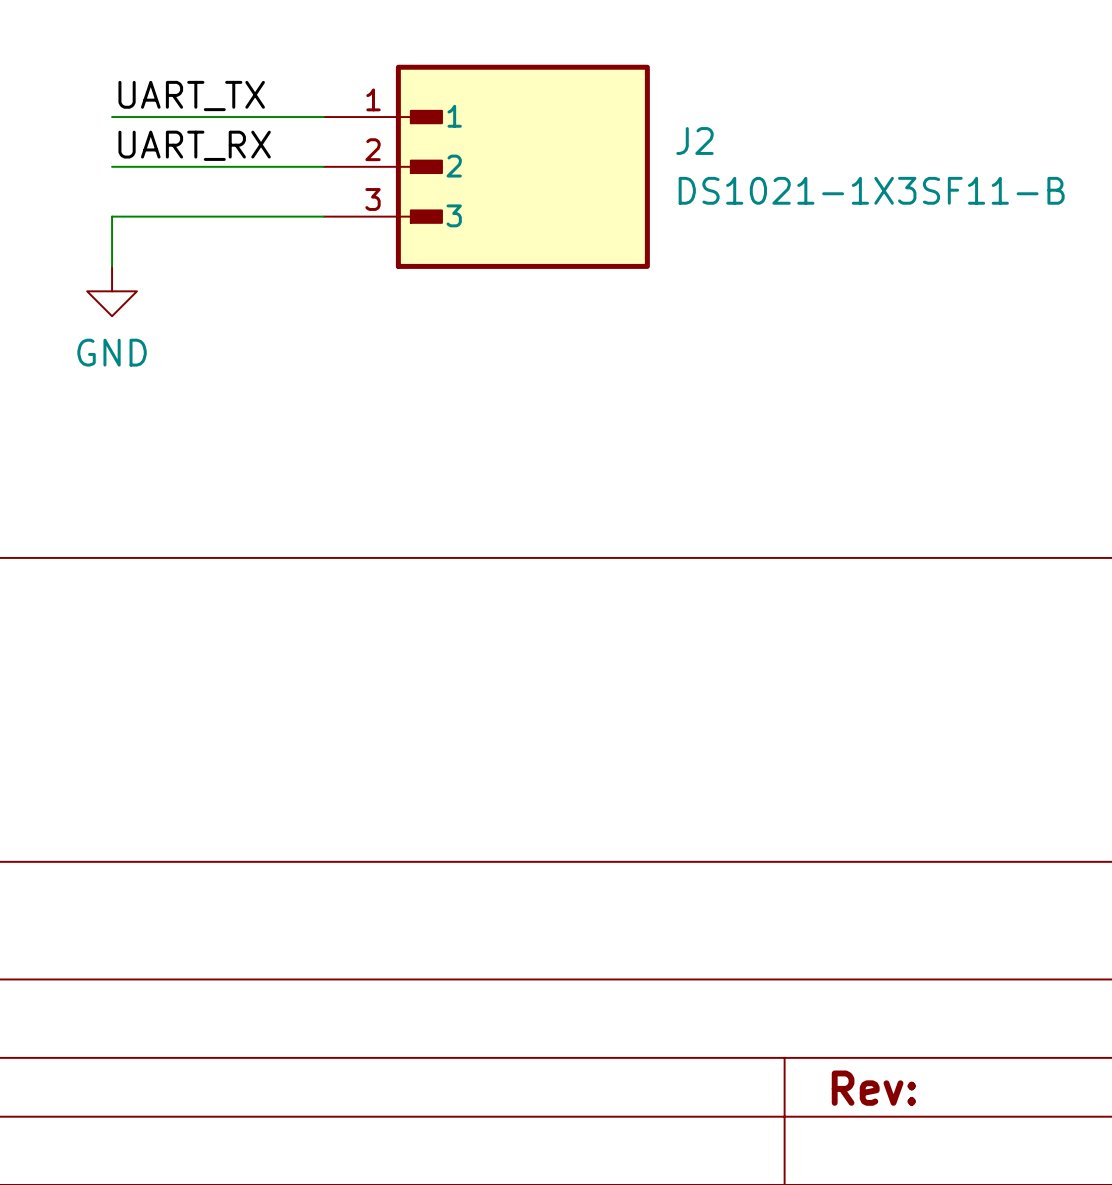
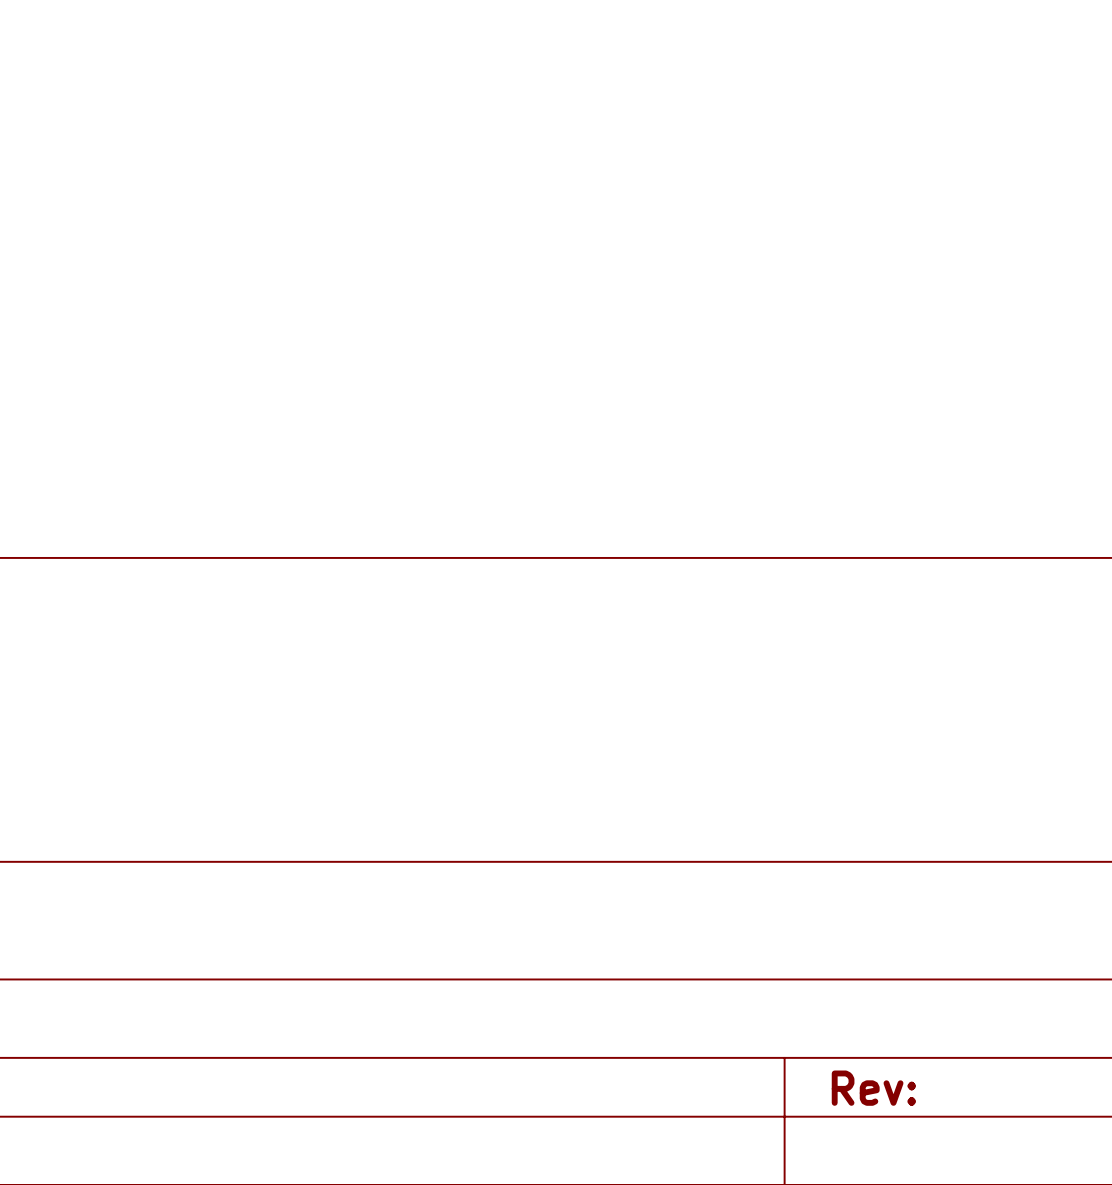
label: UART_TX (191, 96) -> none
wire: (112, 117) (323, 117) -> none
label: UART_RX (194, 145) -> none
wire: (112, 166) (323, 166) -> none
J2: DS1021-1X3SF11-B (486, 166) -> none
wire: (323, 216) (112, 216) (112, 266) -> none
power symbol: GND (112, 291) -> none

